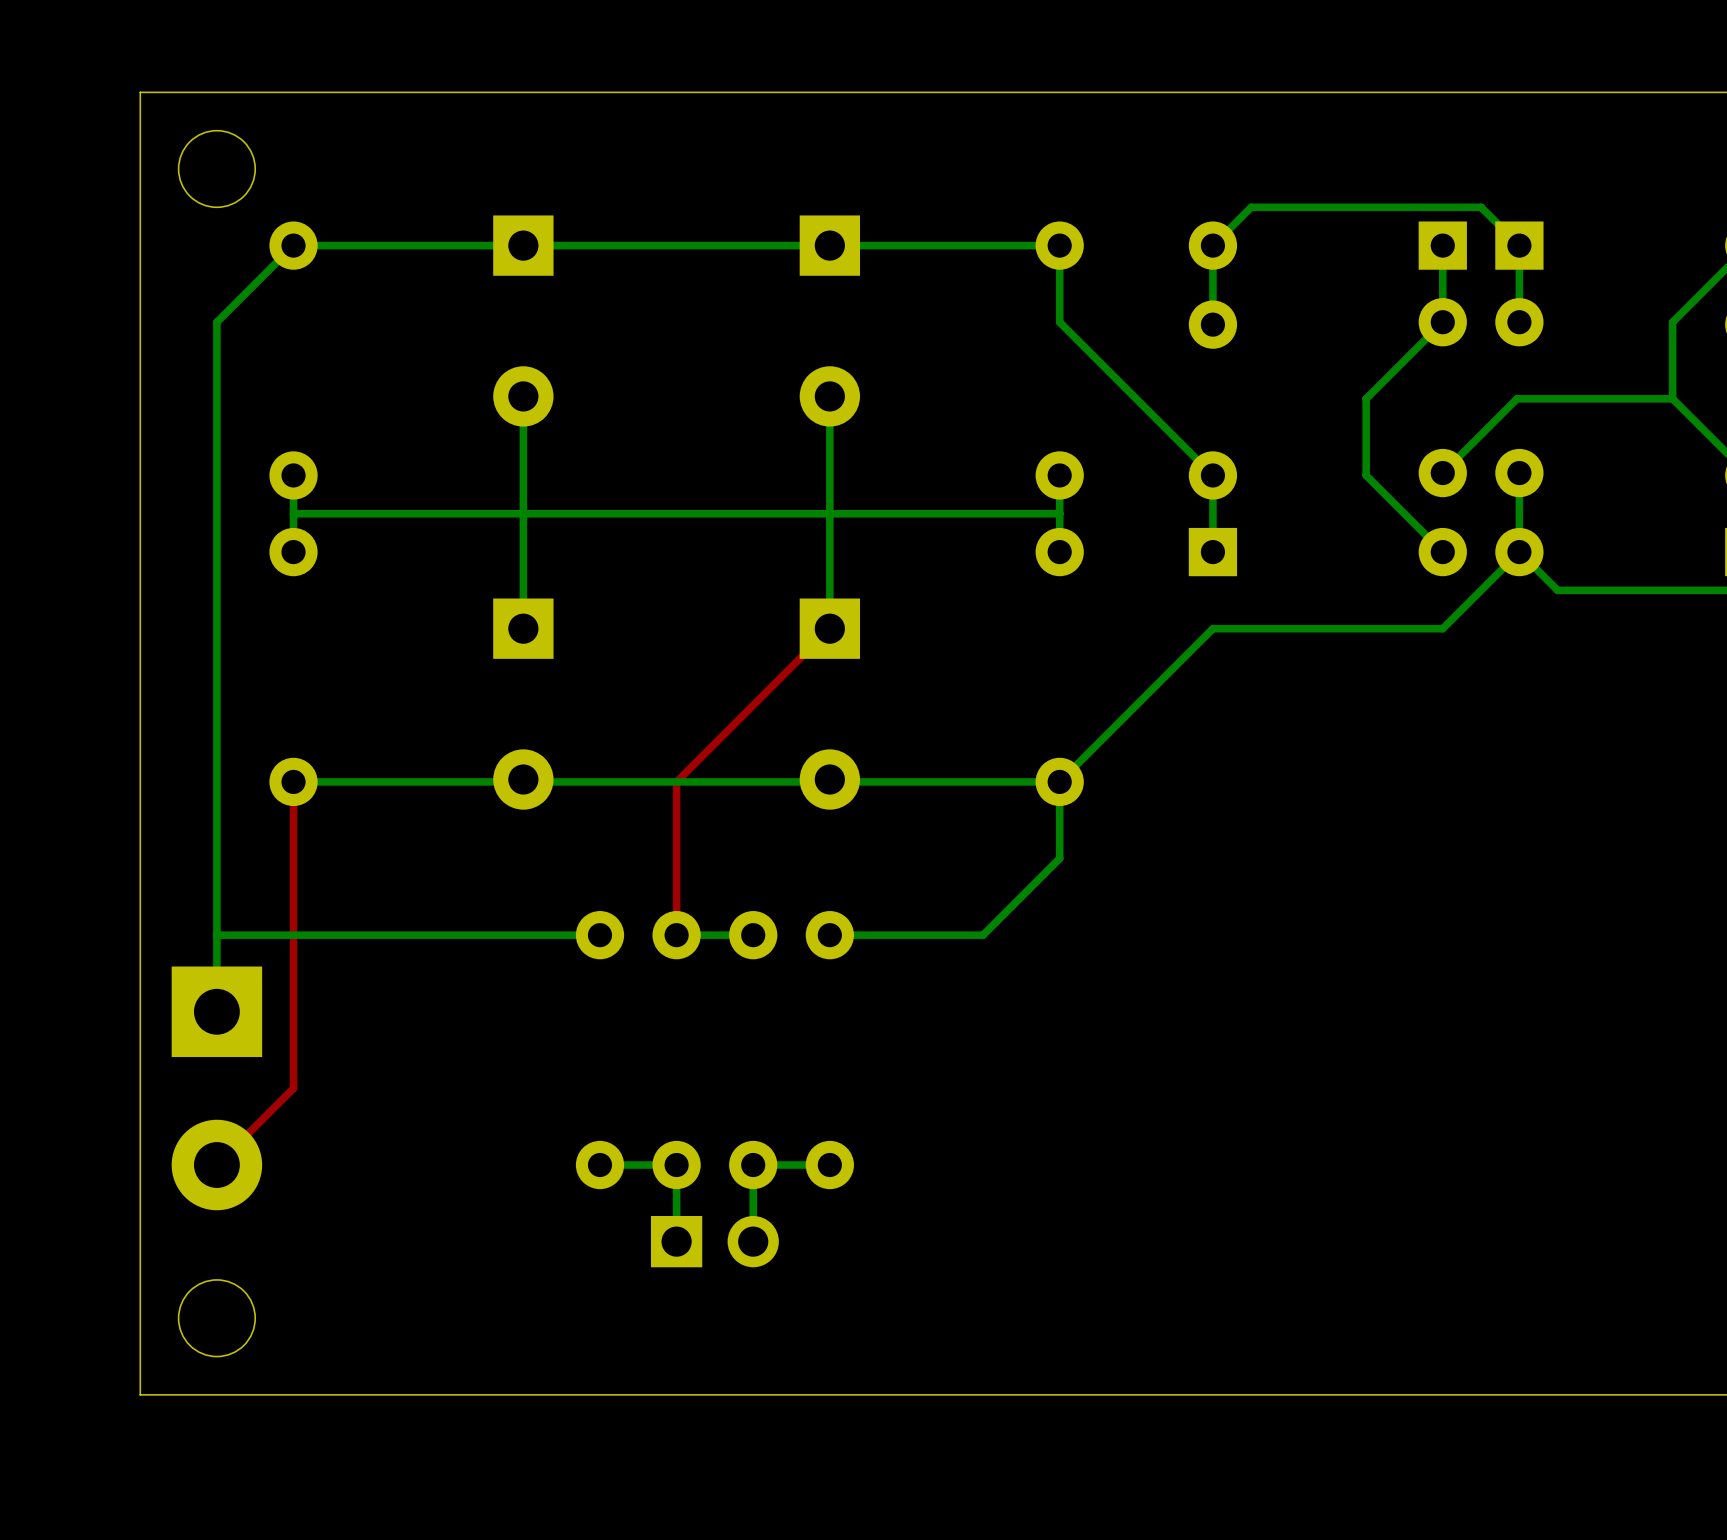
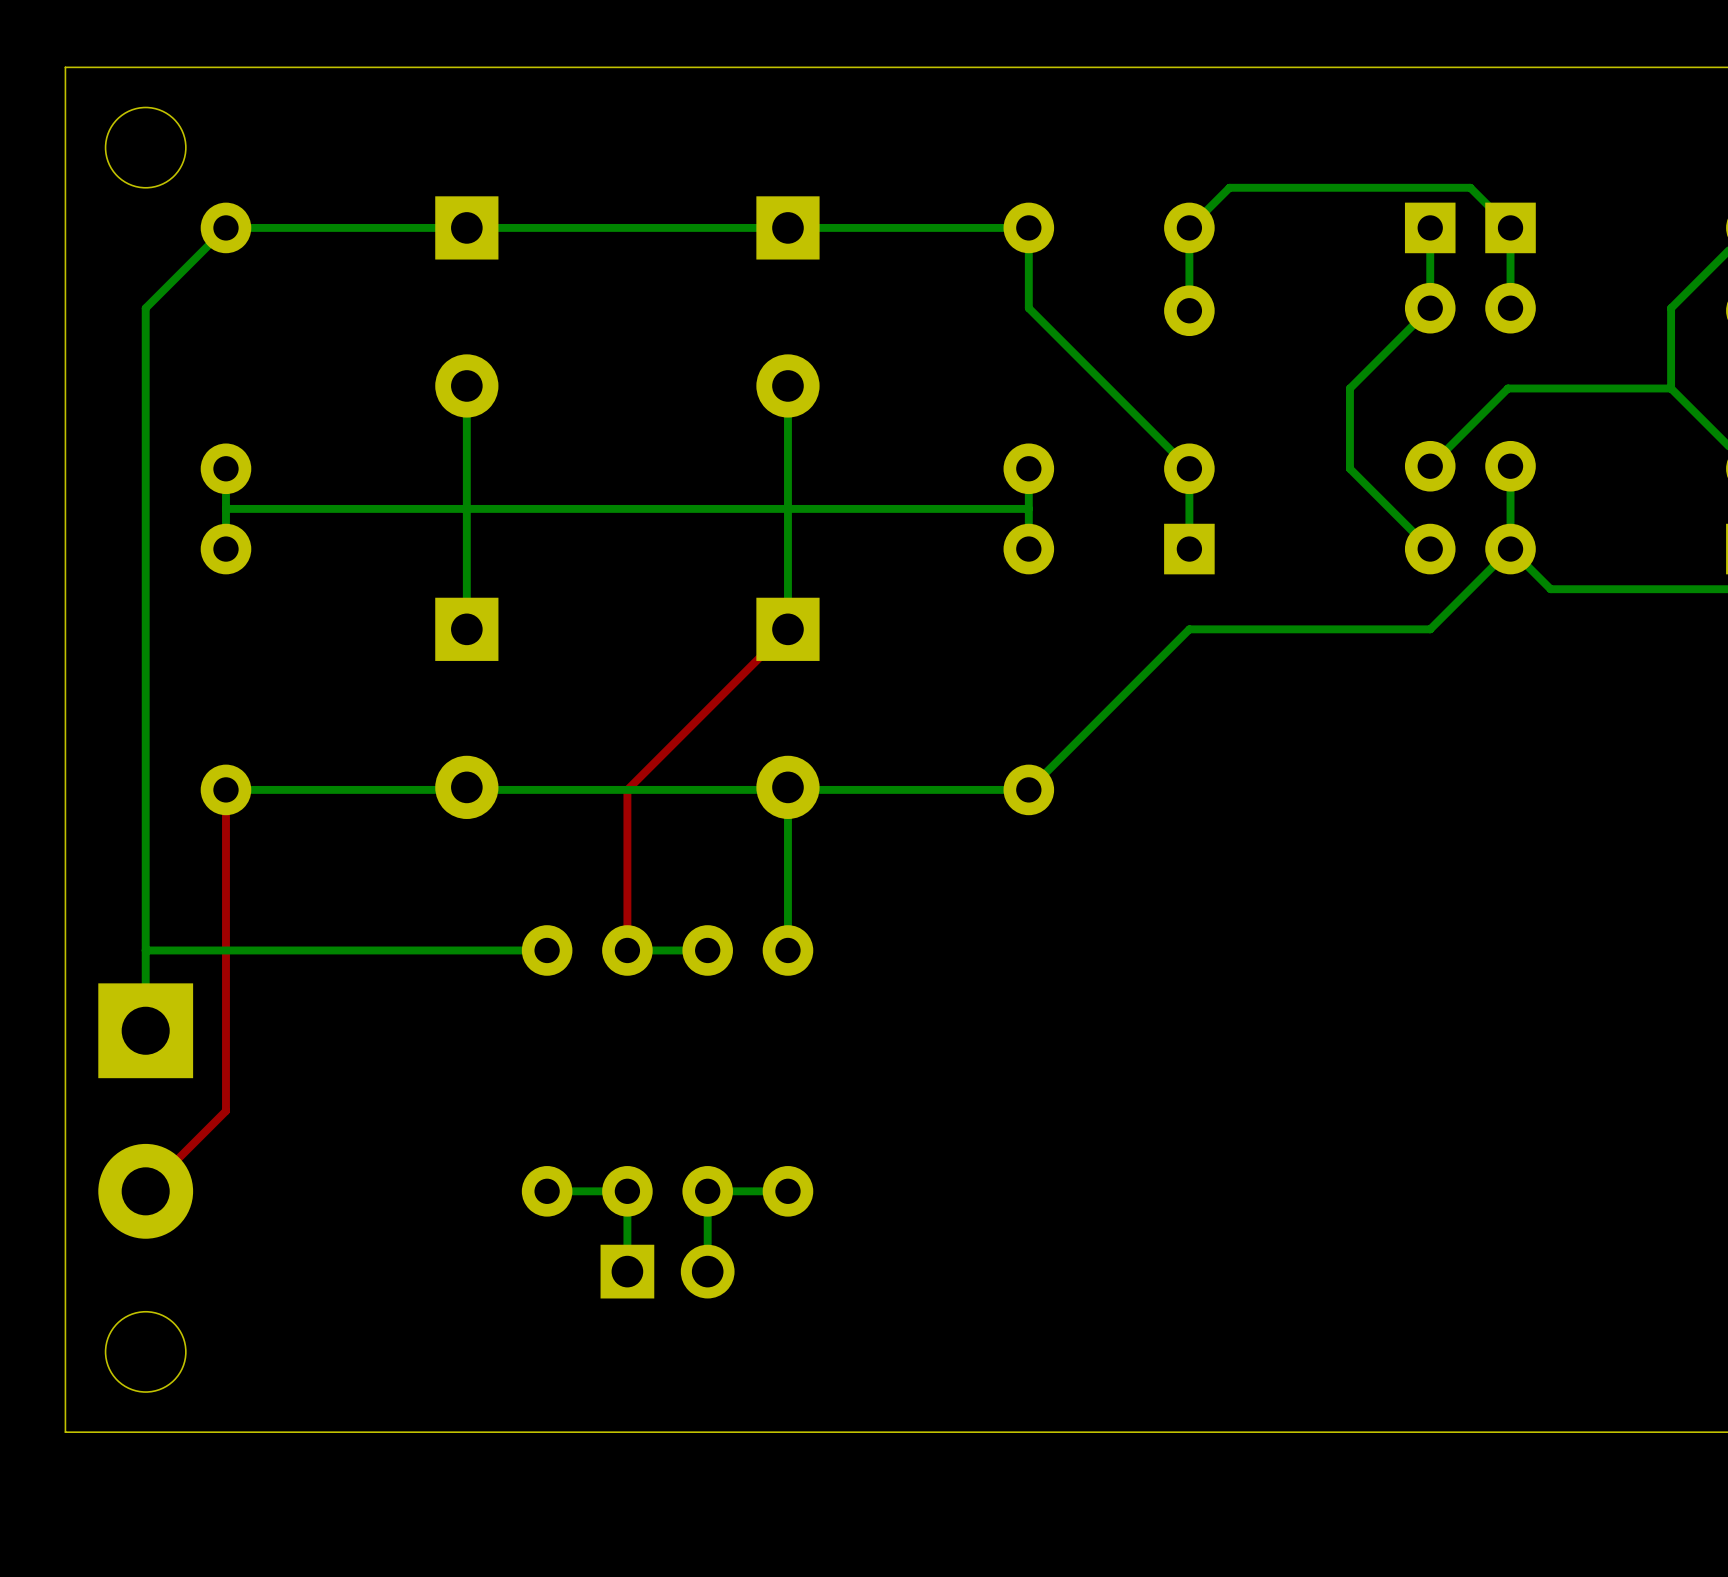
bottom track: (1059, 781) (1059, 858) (983, 935) (829, 935) -> (787, 787) (787, 950)

